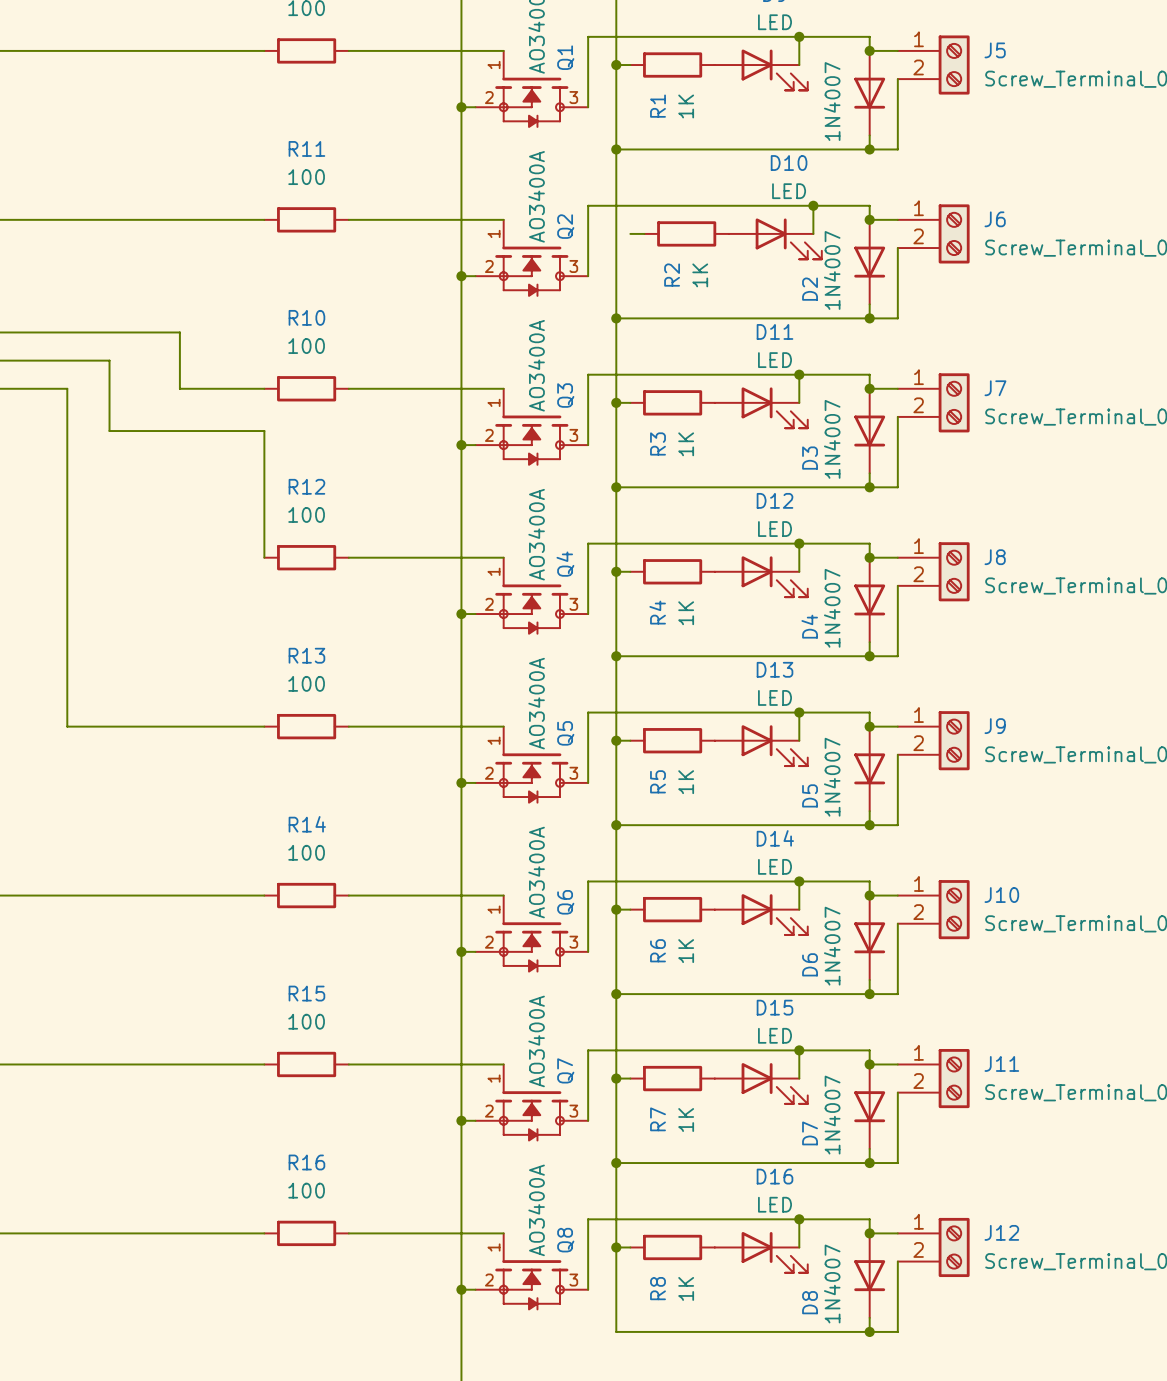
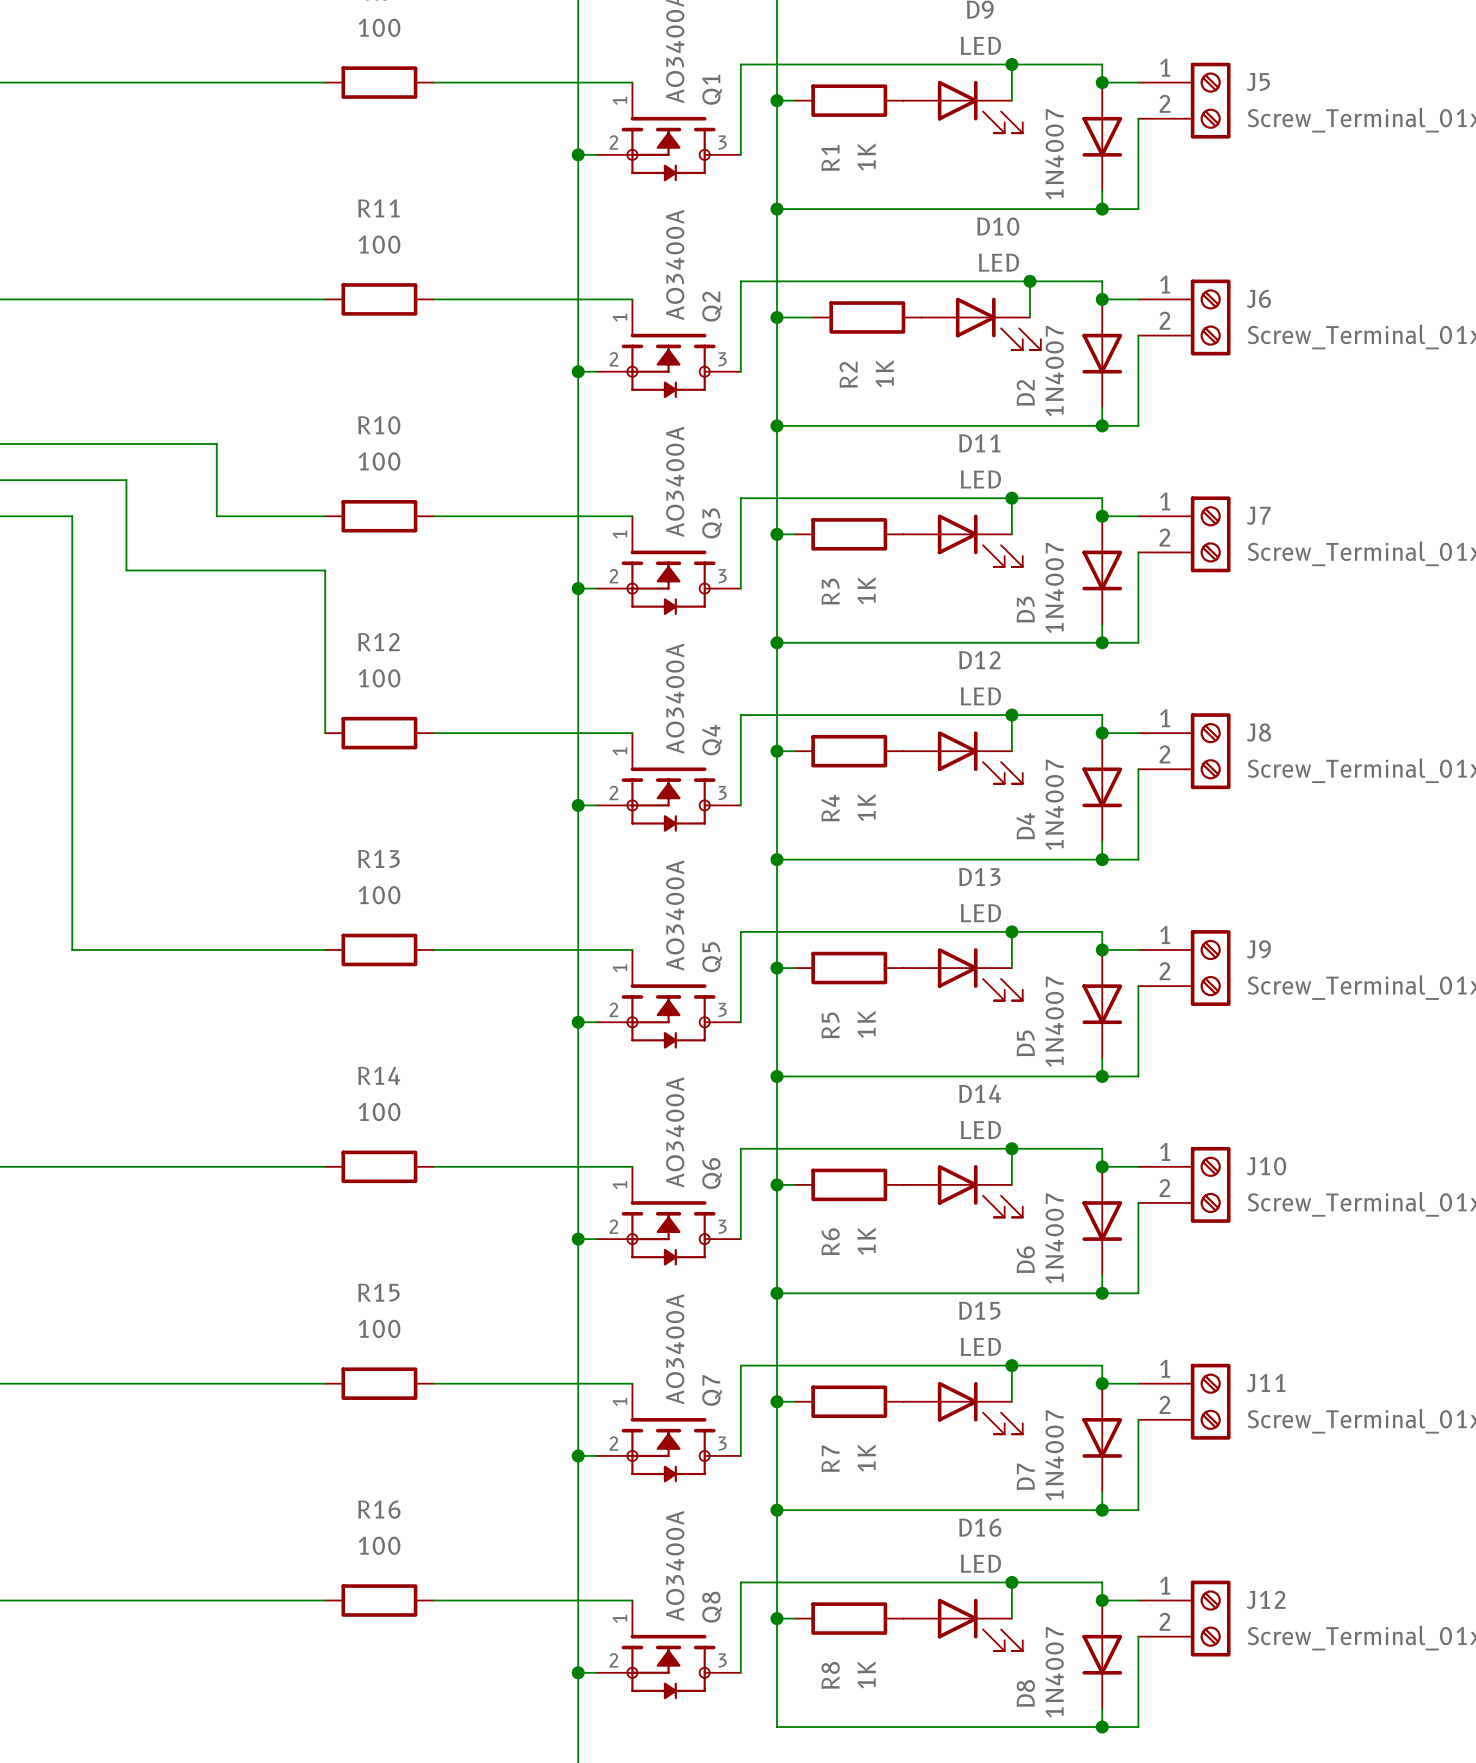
wire: none -> (776, 317) (795, 317)
junction: none -> (776, 317)

